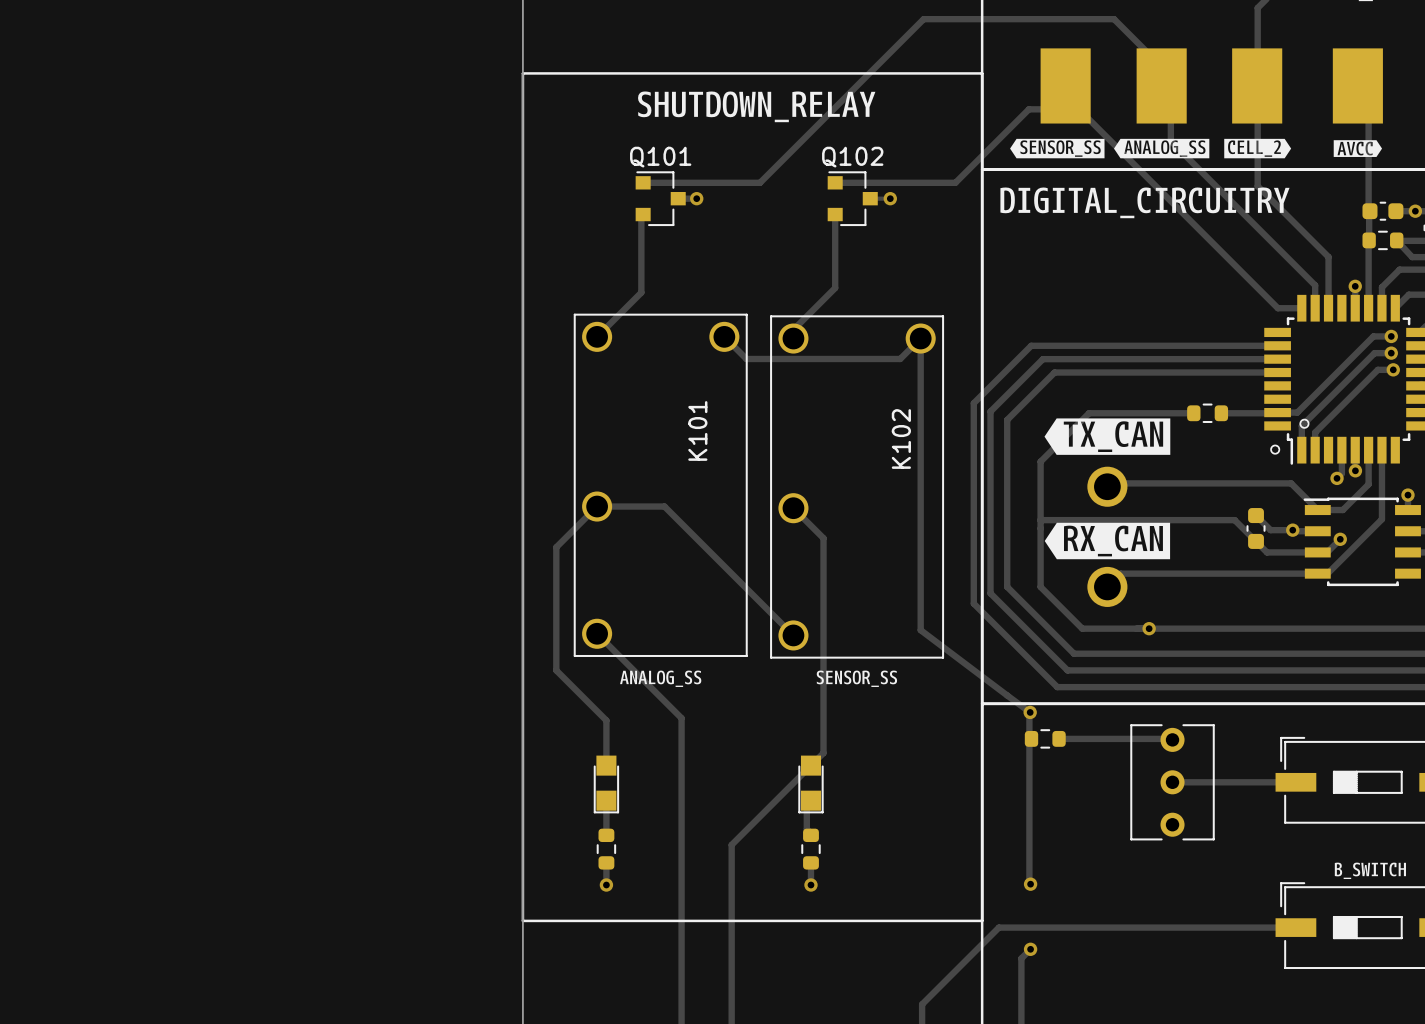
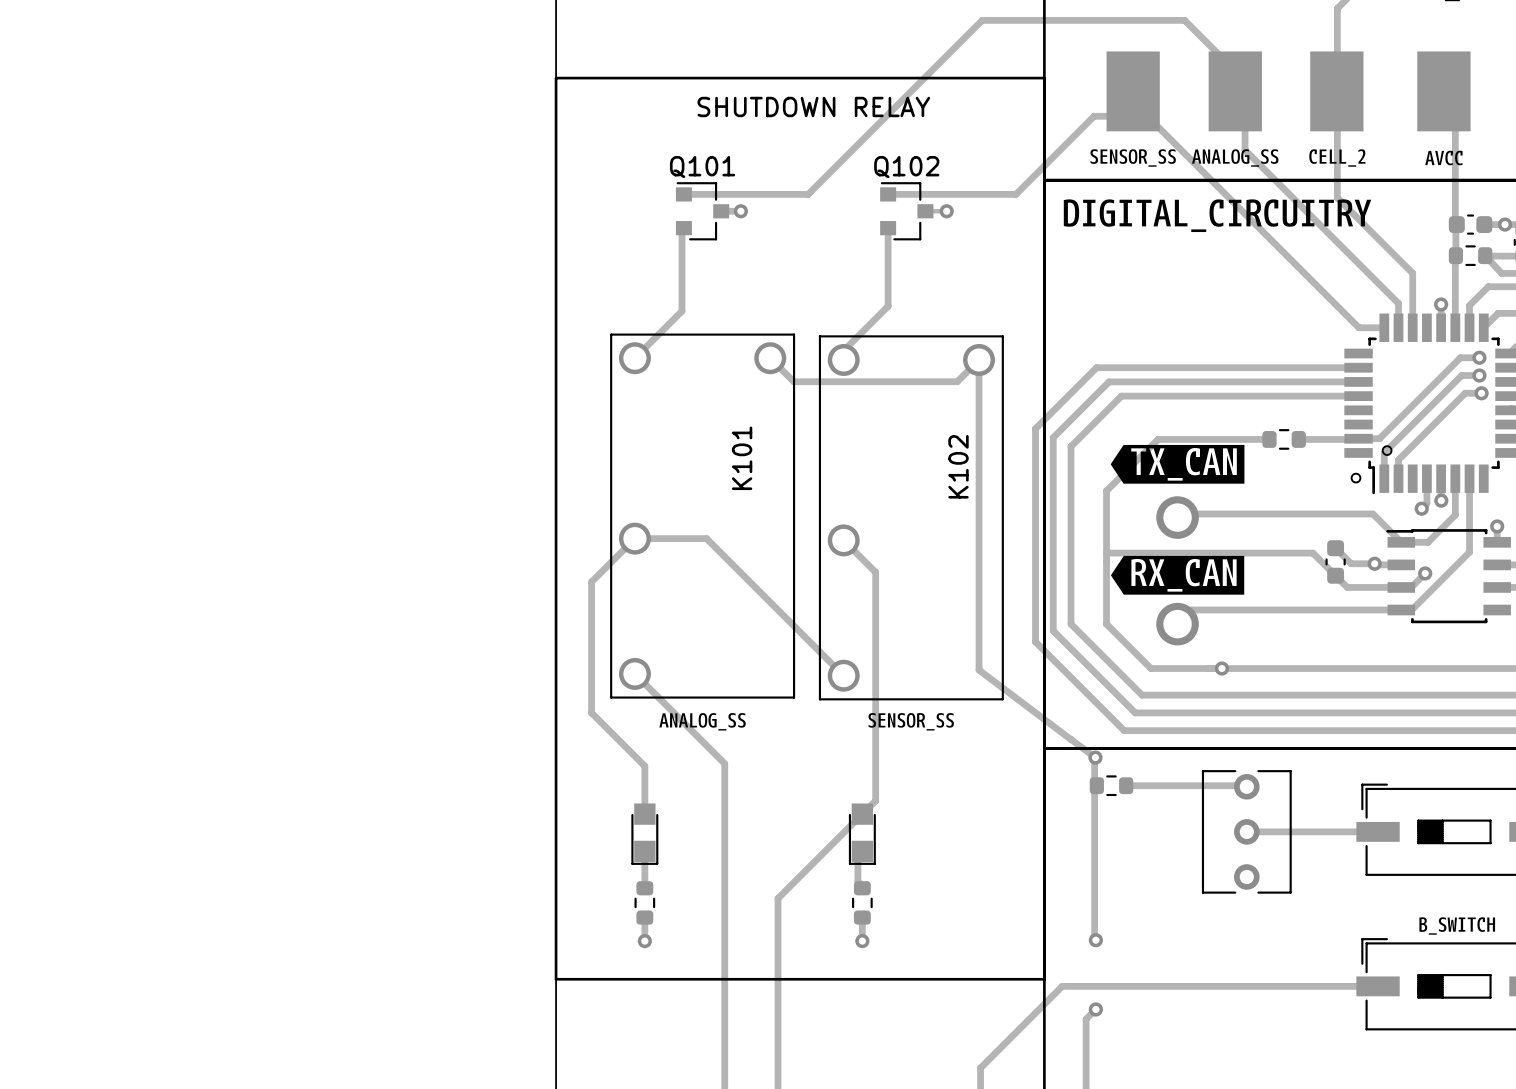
drawing: [638, 91, 876, 123] -> none
text: none -> SHUTDOWN RELAY (813, 106)
drawing shape: [1010, 138, 1105, 159] -> [1090, 149, 1176, 167]
drawing shape: [1114, 138, 1210, 159] -> [1192, 149, 1279, 167]
drawing shape: [1224, 138, 1292, 159] -> [1309, 149, 1366, 167]
drawing shape: [1333, 140, 1383, 157] -> [1425, 150, 1463, 166]

